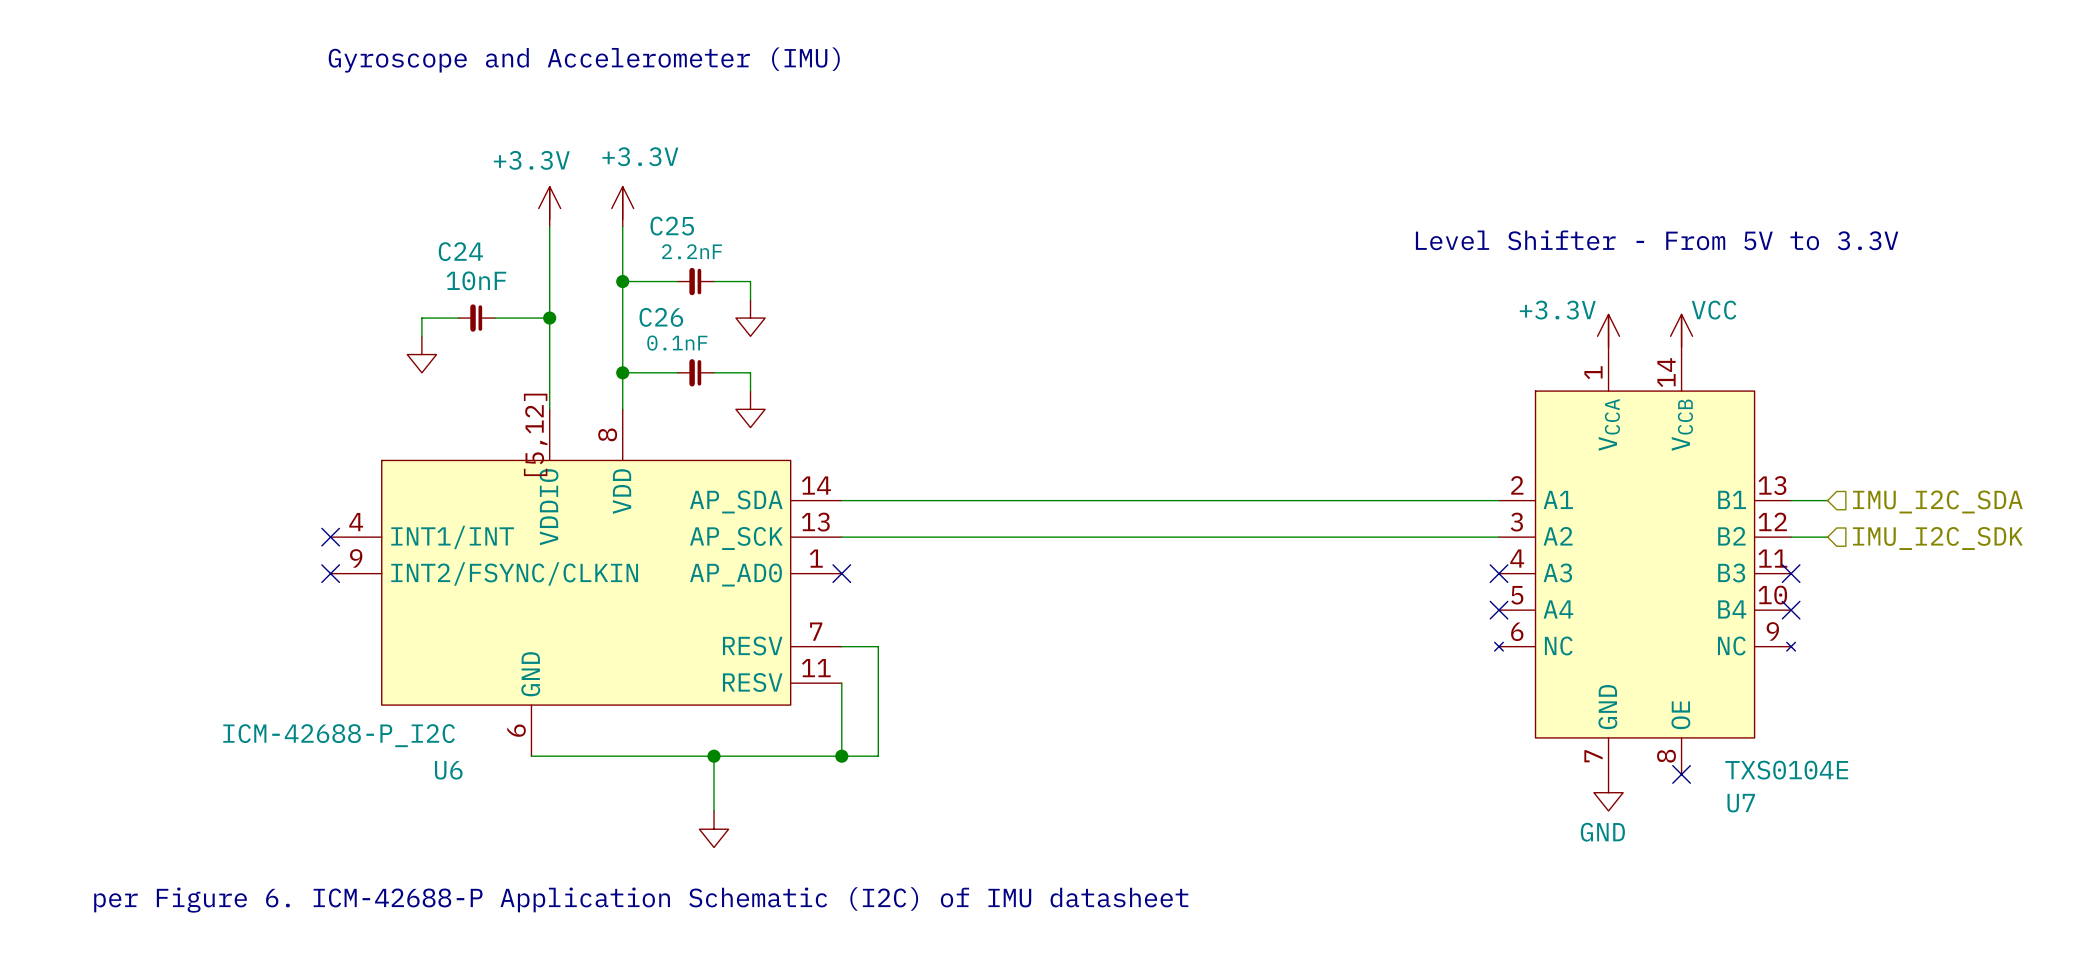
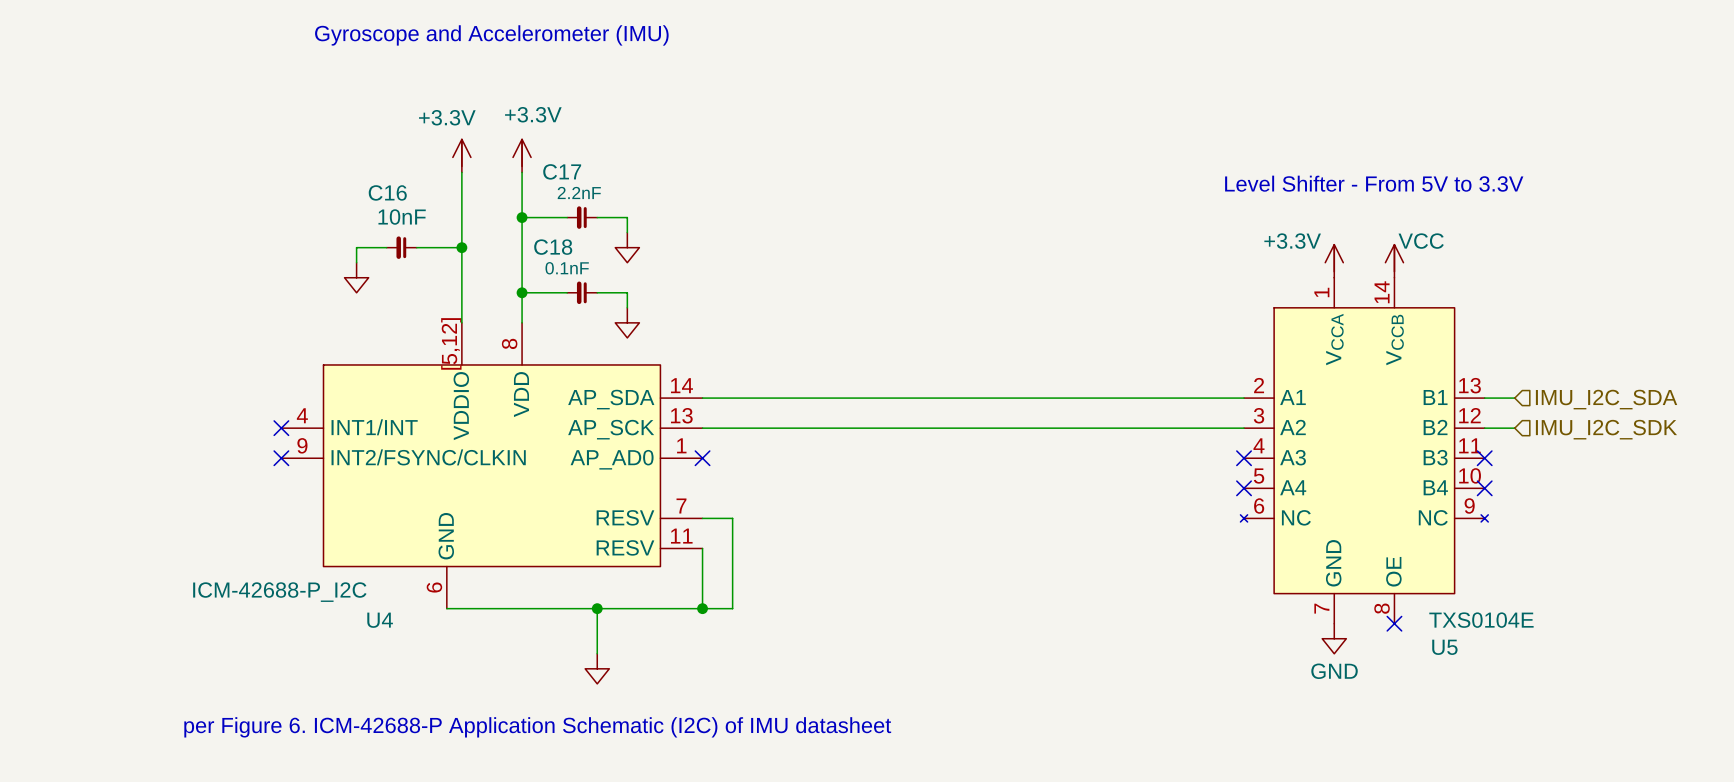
C25 name: C25 (672, 226) -> C17 (562, 171)
C24 name: C24 (460, 251) -> C16 (387, 192)
C26 name: C26 (661, 317) -> C18 (553, 247)
U6 name: U6 (448, 770) -> U4 (380, 620)
U7 name: U7 (1741, 803) -> U5 (1444, 647)

